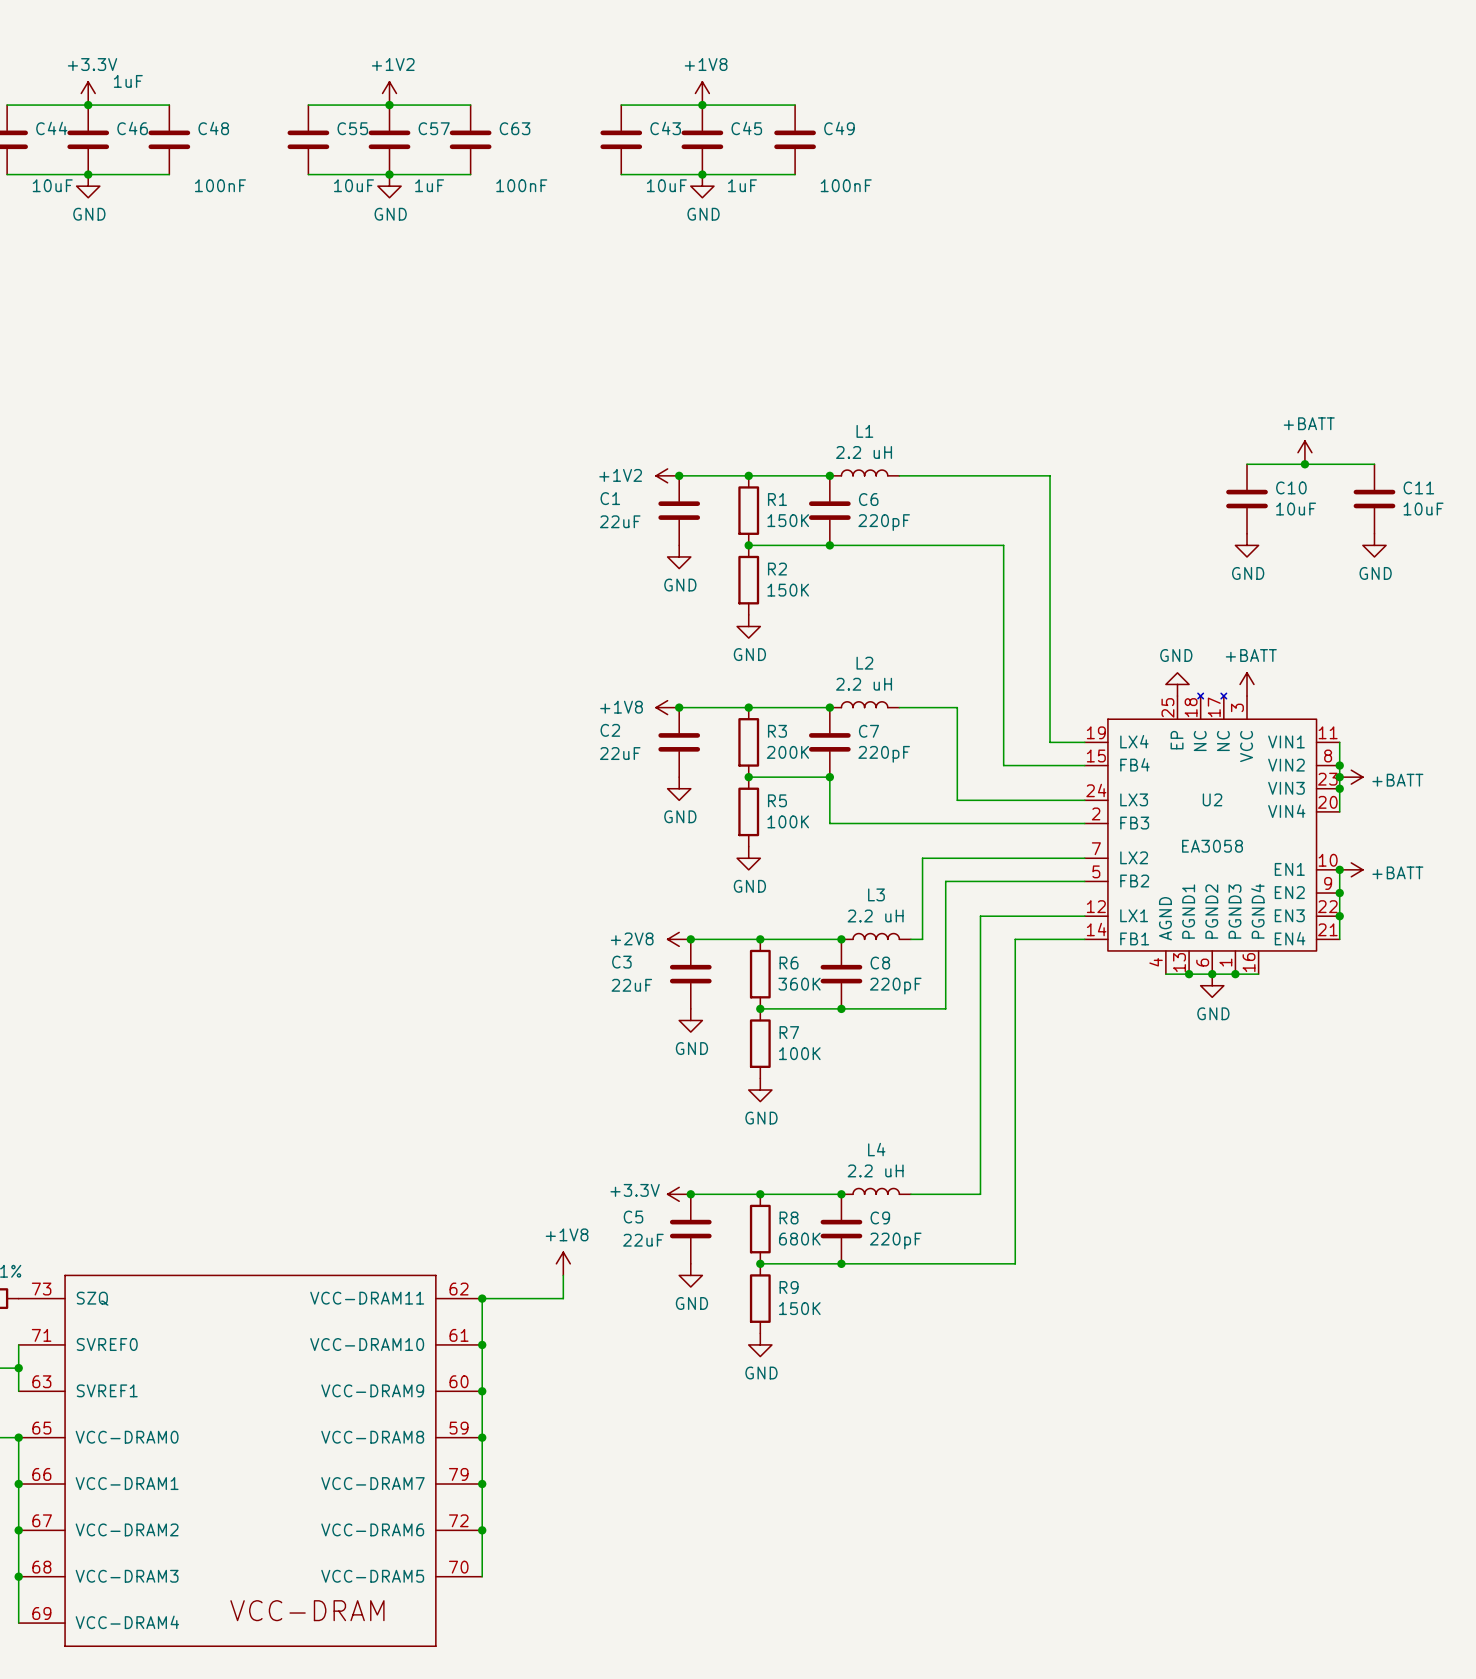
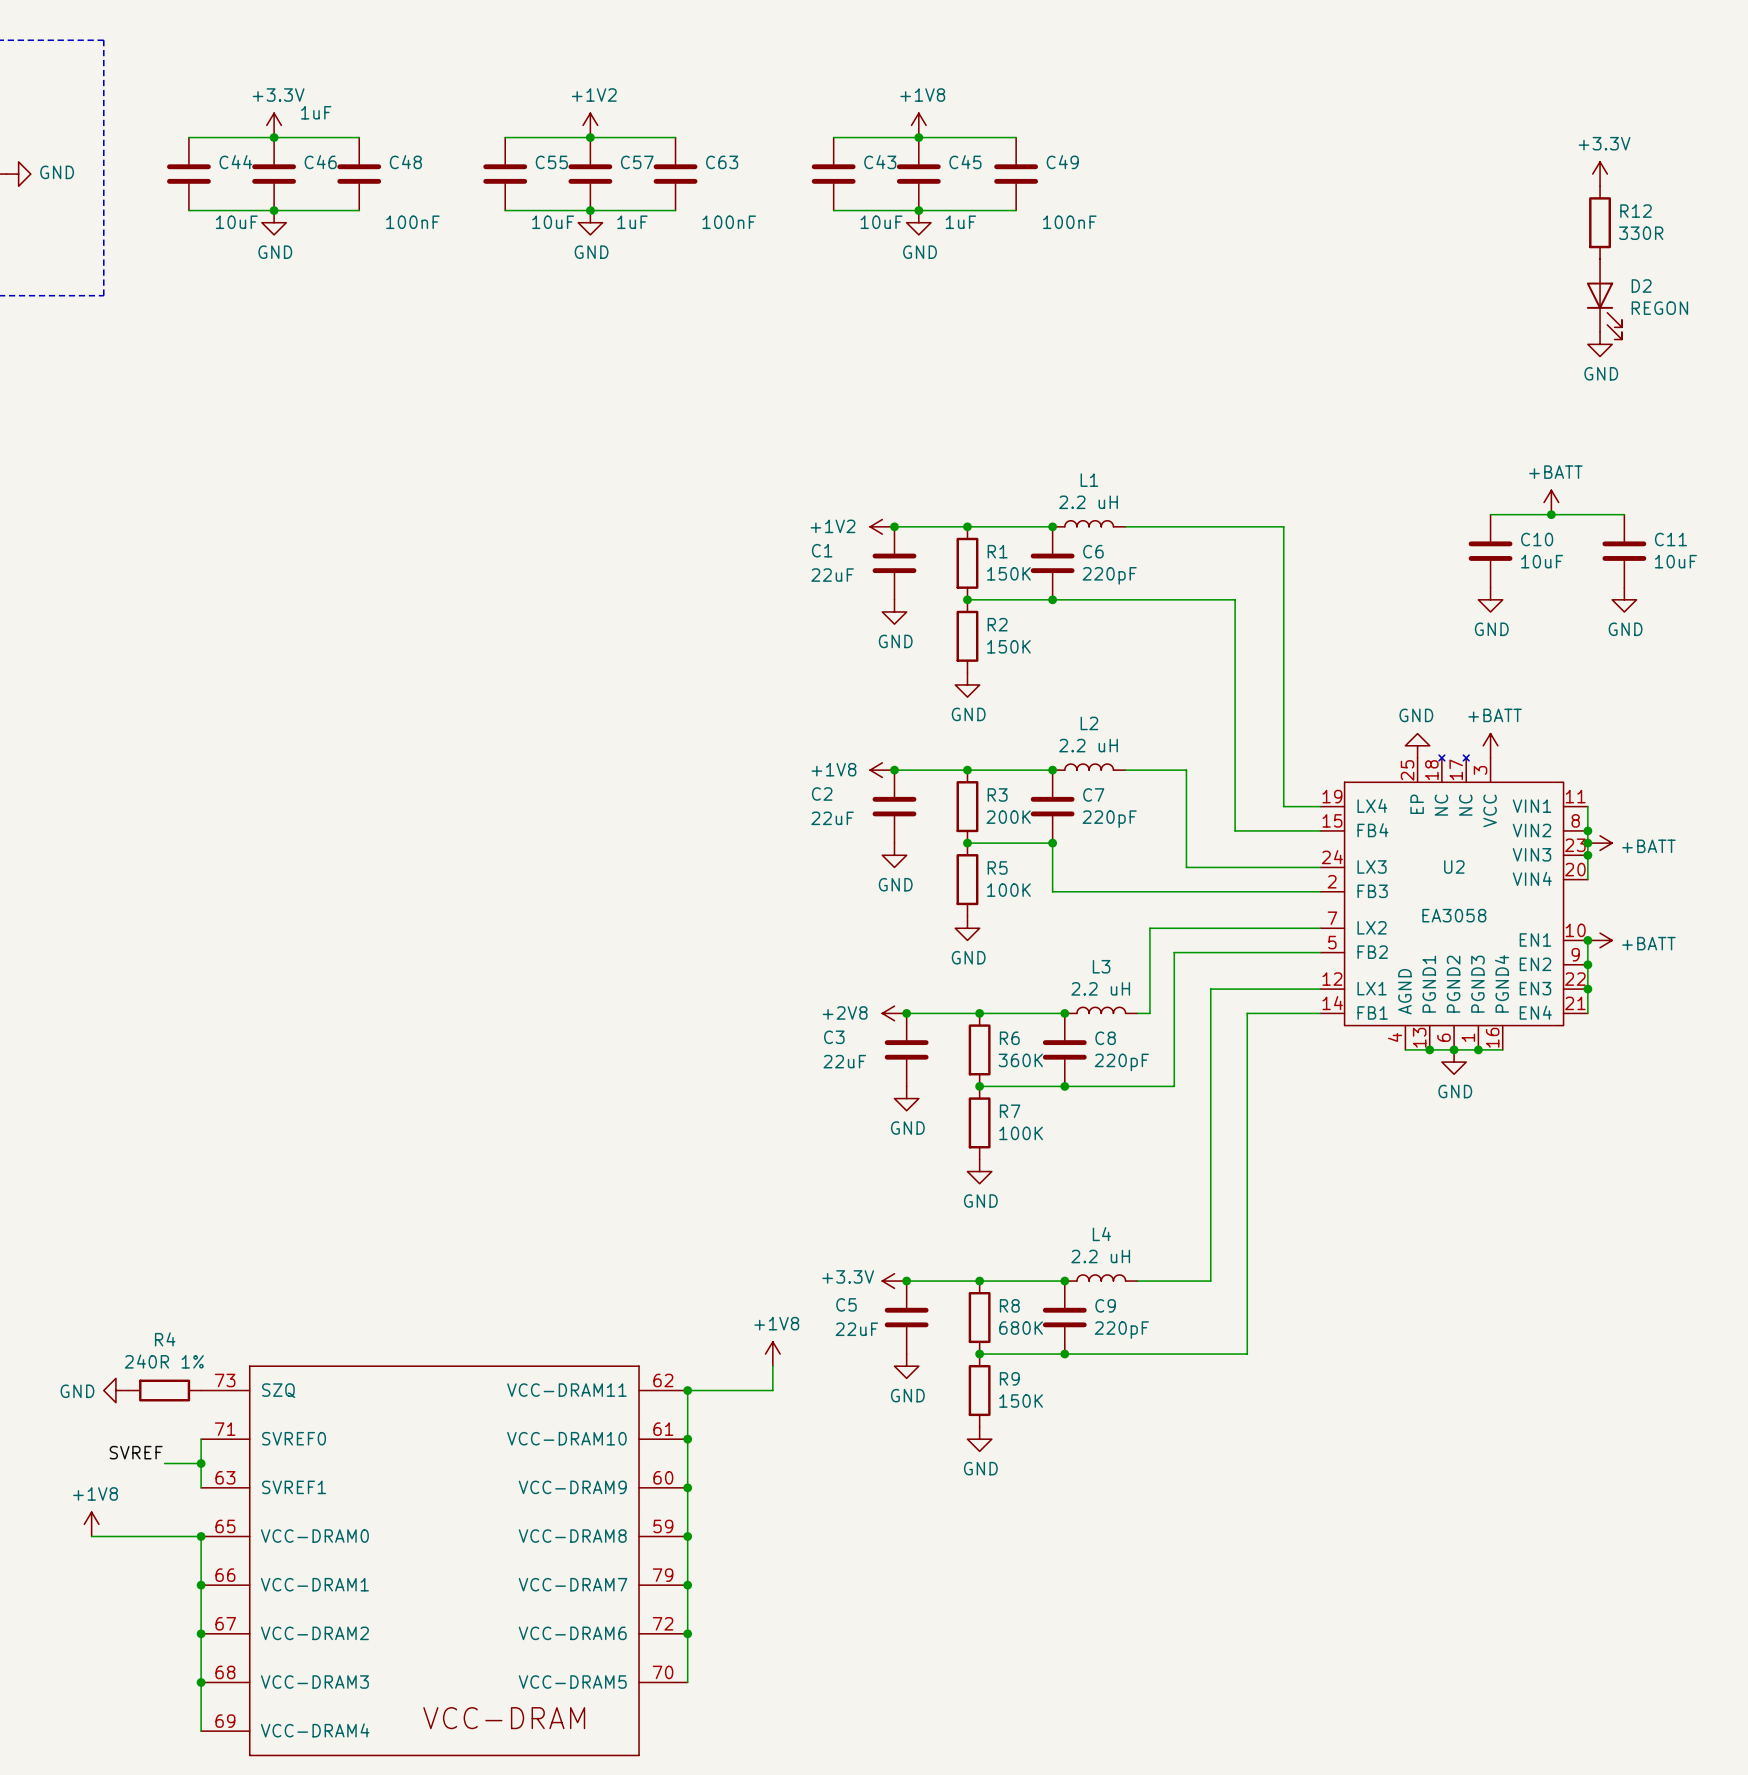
power symbol: none -> +3.3V (1600, 174)
R12: none -> 330R (1600, 222)
D2: none -> REGON (1604, 299)
power symbol: none -> GND (1600, 344)

